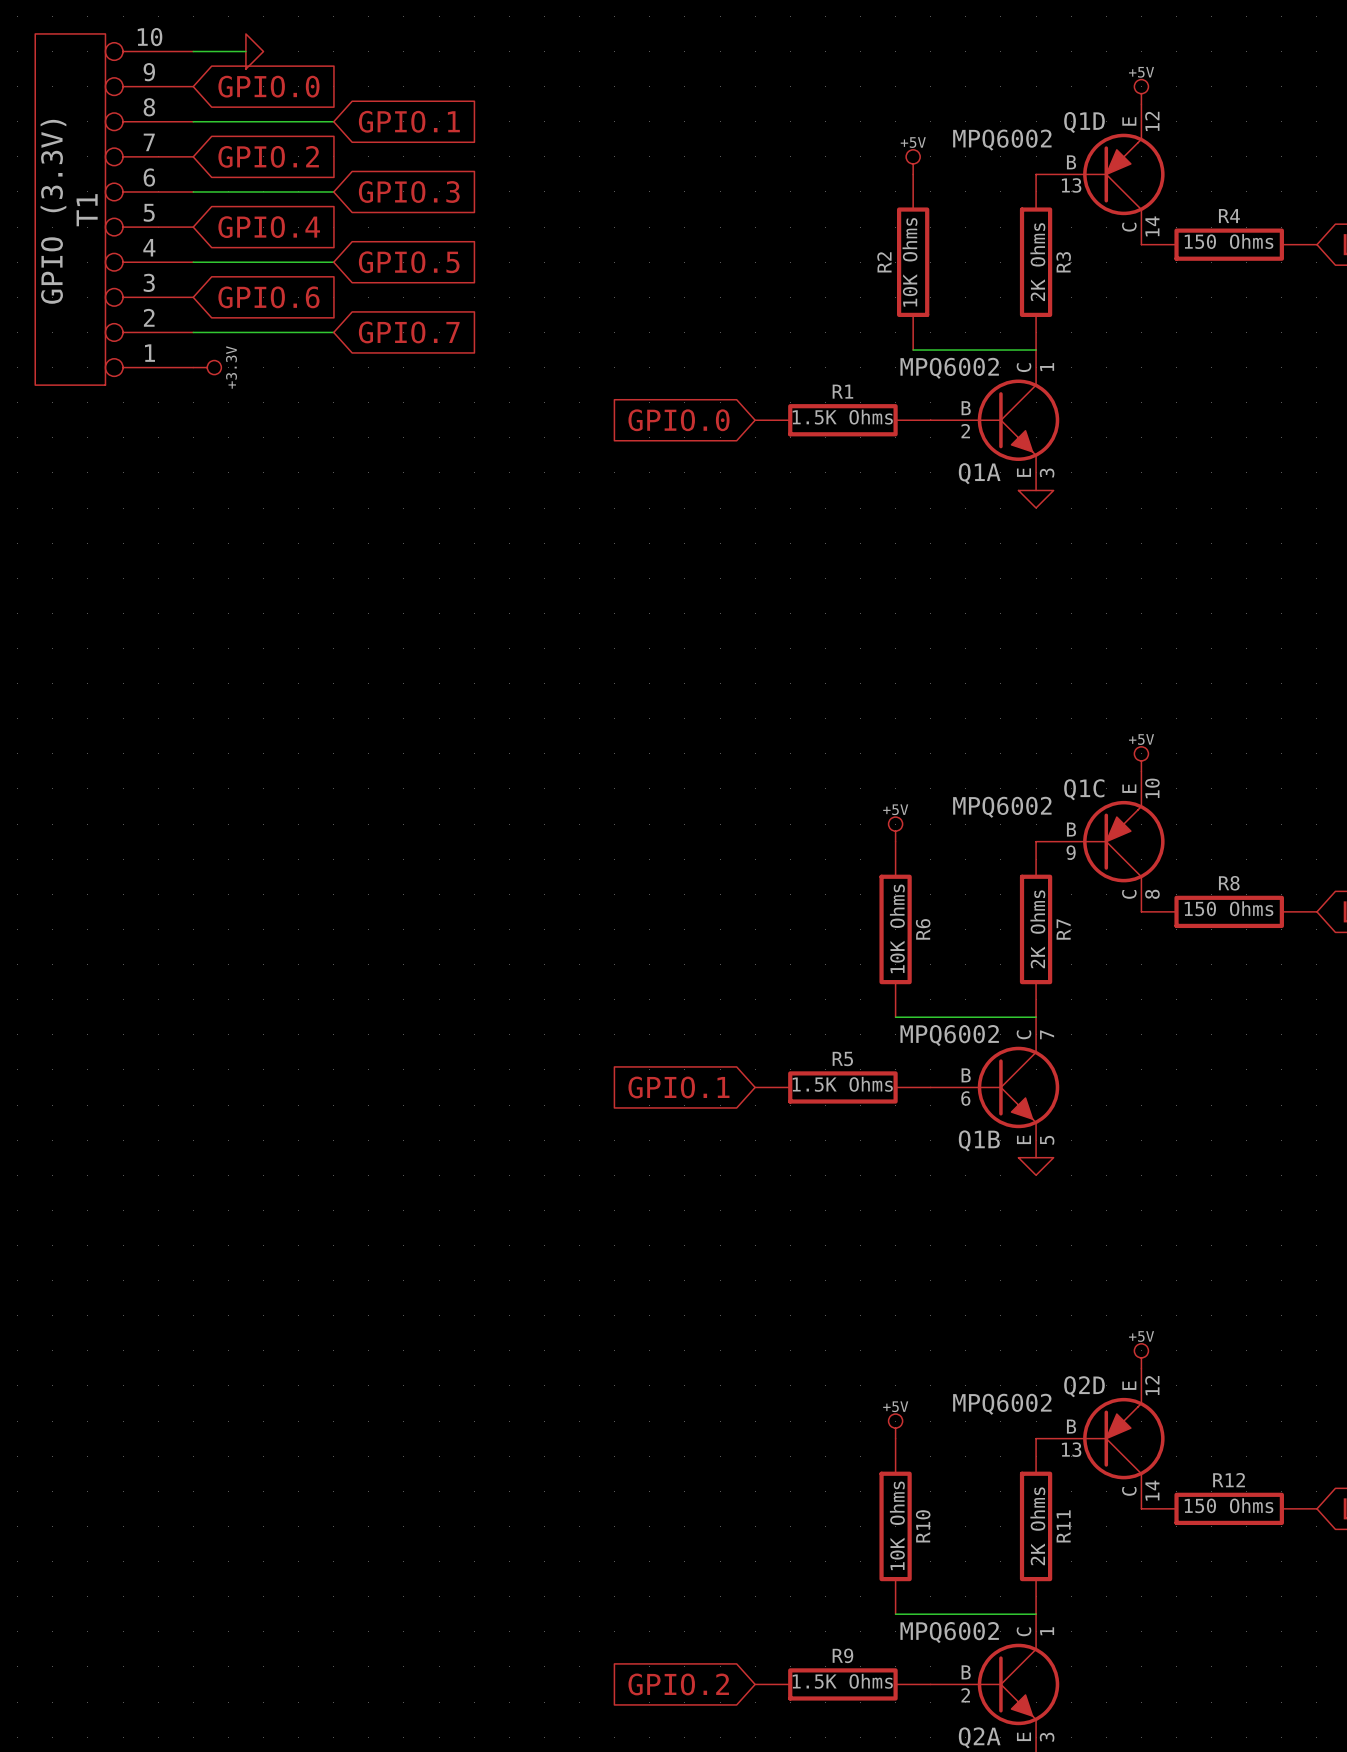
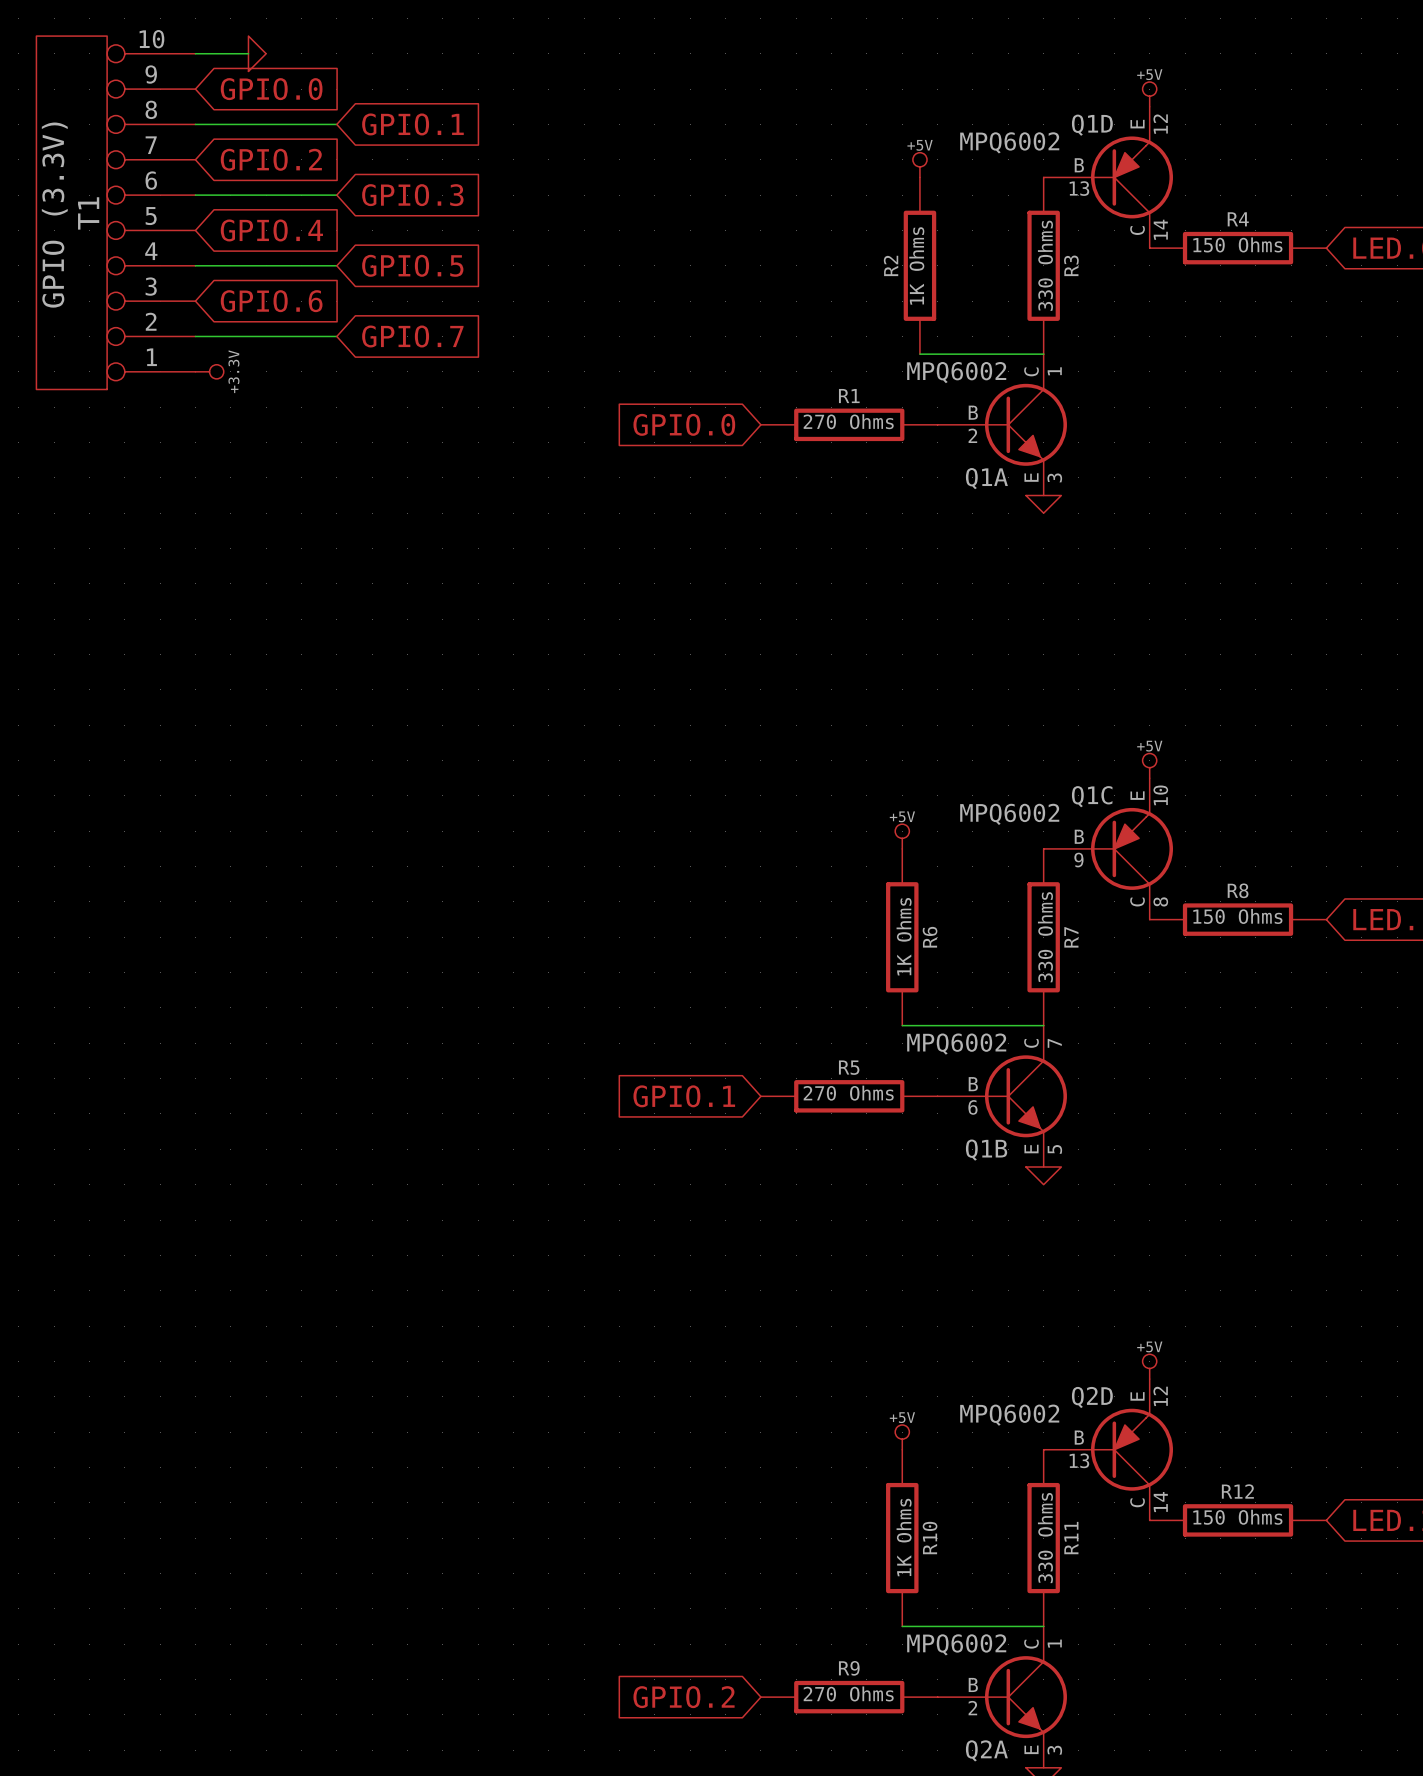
R2 value: 10K Ohms (910, 262) -> 1K Ohms (916, 265)
R3 value: 2K Ohms (1037, 262) -> 330 Ohms (1045, 265)
R1 value: 1.5K Ohms (842, 417) -> 270 Ohms (848, 421)
R6 value: 10K Ohms (897, 928) -> 1K Ohms (904, 936)
R7 value: 2K Ohms (1037, 929) -> 330 Ohms (1045, 937)
R5 value: 1.5K Ohms (842, 1084) -> 270 Ohms (848, 1093)
R10 value: 10K Ohms (897, 1525) -> 1K Ohms (904, 1537)
R11 value: 2K Ohms (1037, 1526) -> 330 Ohms (1045, 1538)
R9 value: 1.5K Ohms (842, 1681) -> 270 Ohms (848, 1693)

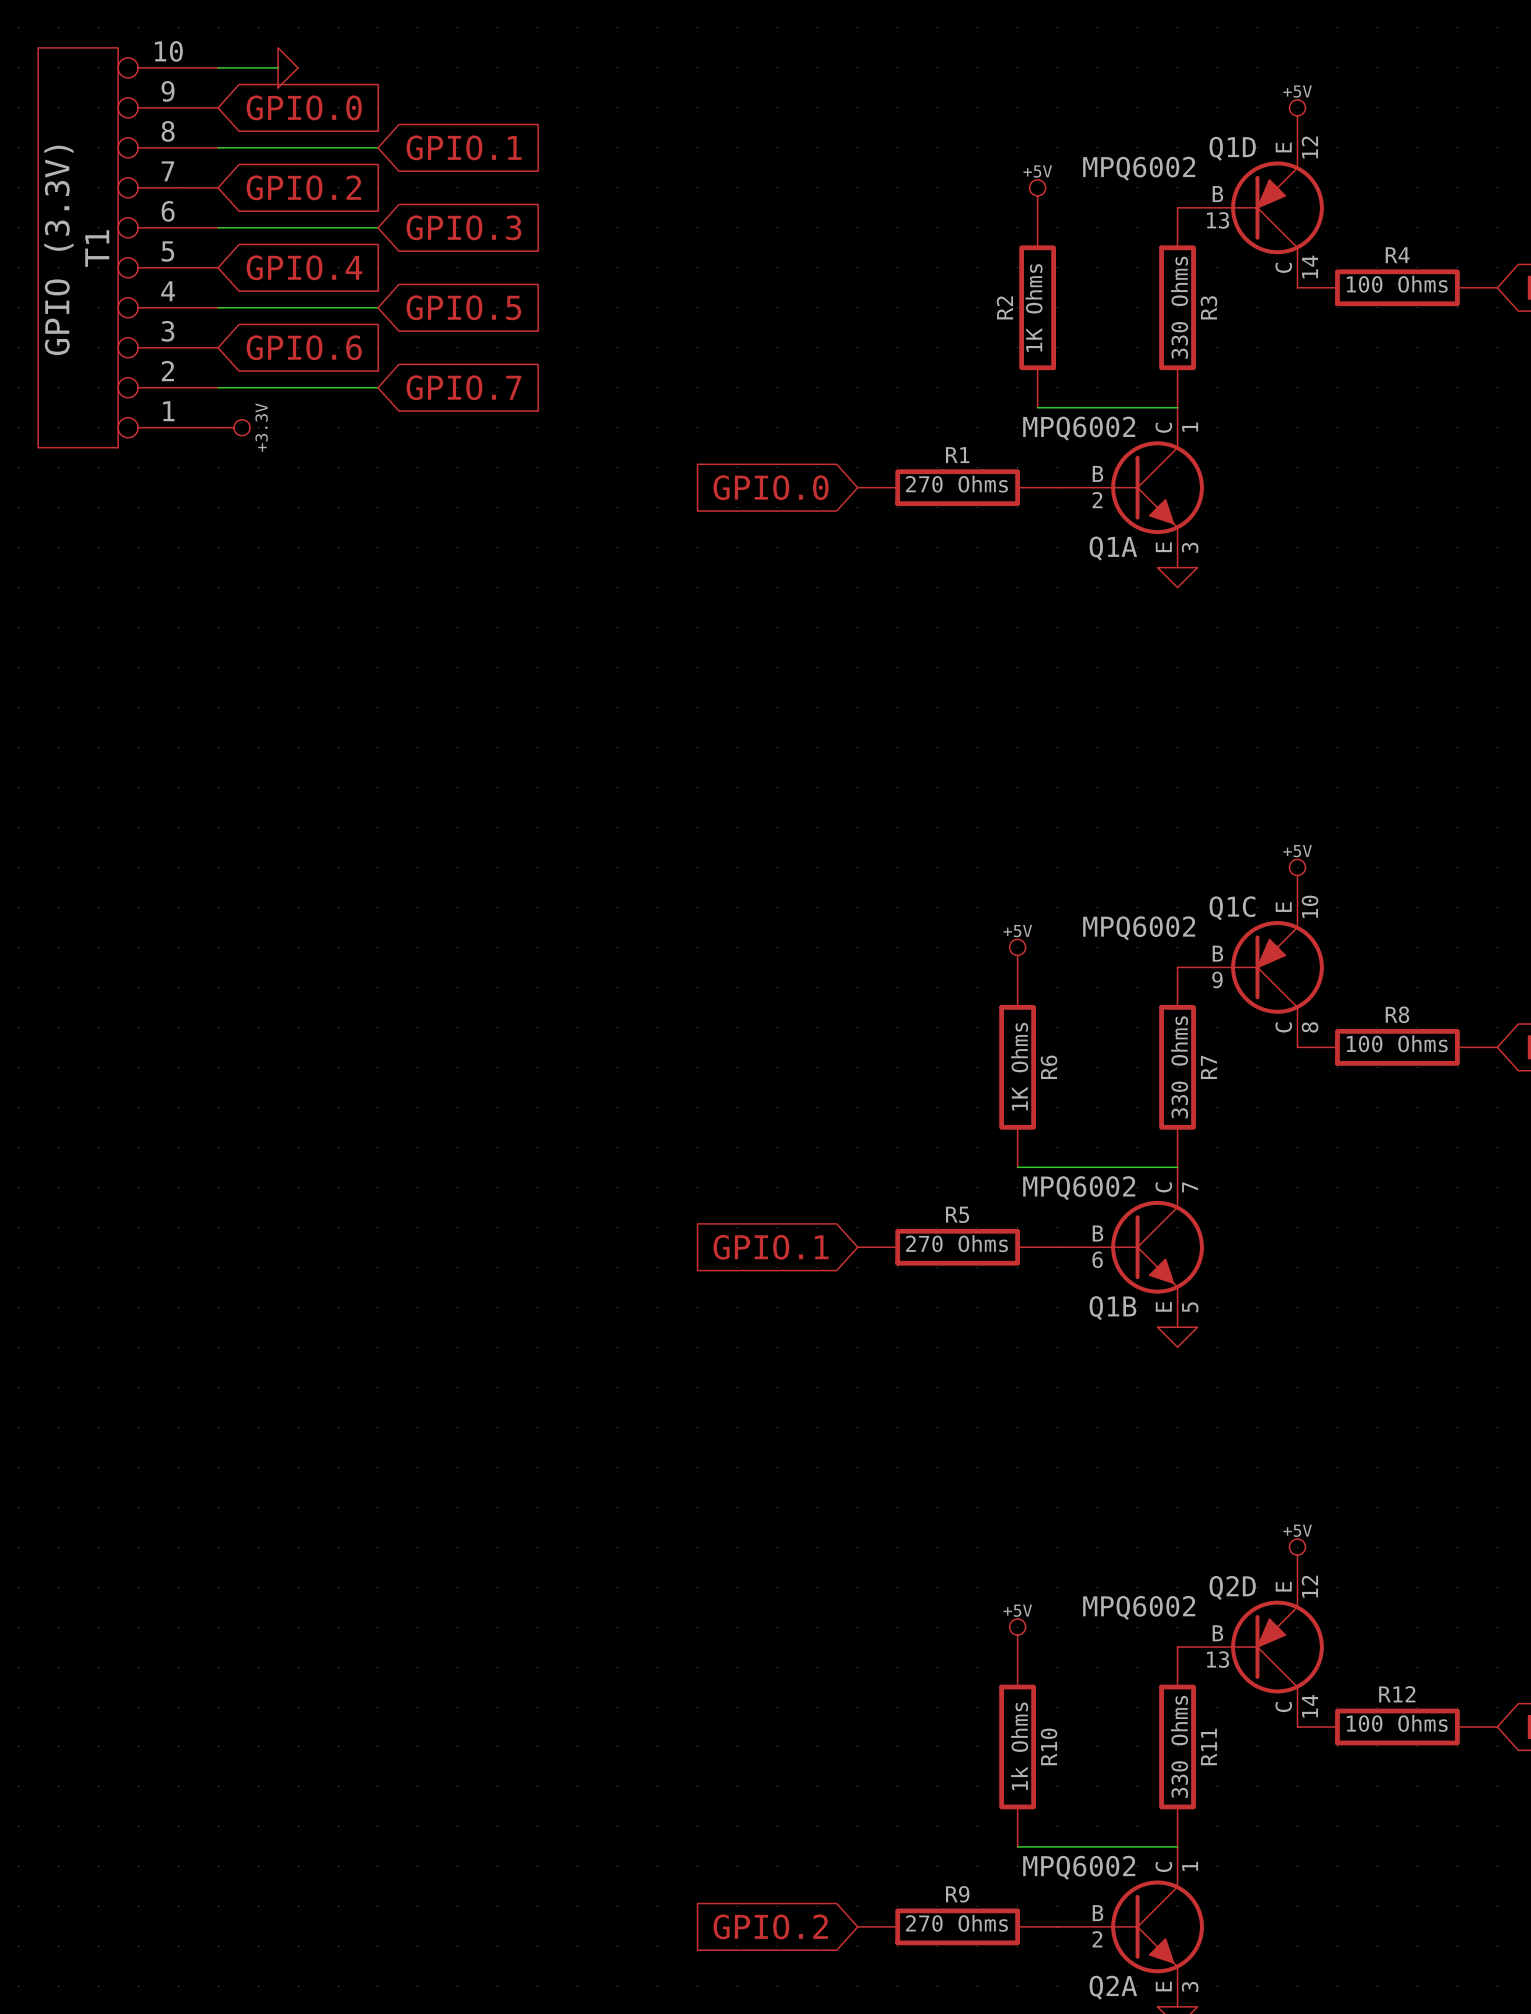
R4 value: 150 Ohms (1237, 244) -> 100 Ohms (1397, 284)
R8 value: 150 Ohms (1237, 916) -> 100 Ohms (1397, 1043)
R12 value: 150 Ohms (1237, 1517) -> 100 Ohms (1397, 1723)
R10 value: 1K Ohms (904, 1537) -> 1k Ohms (1019, 1746)

